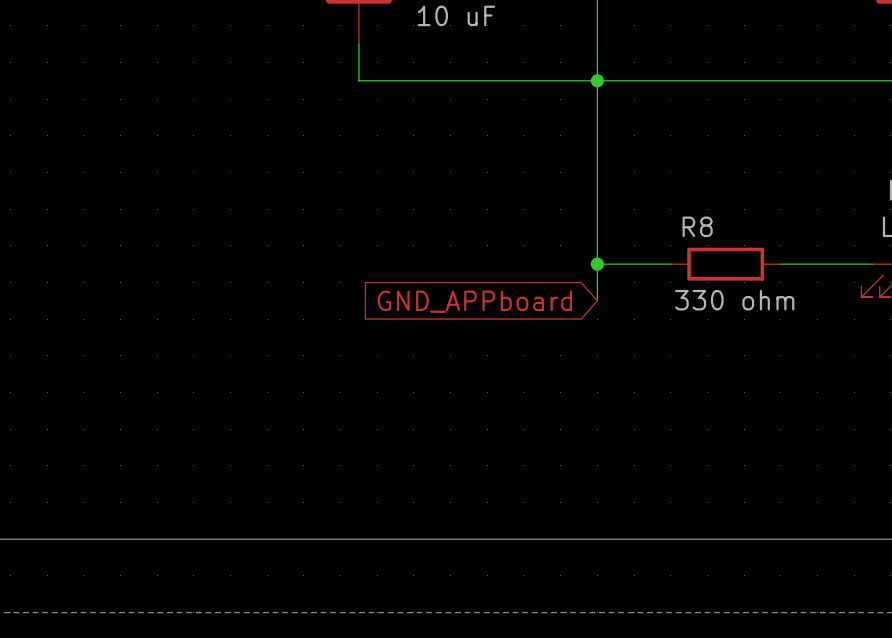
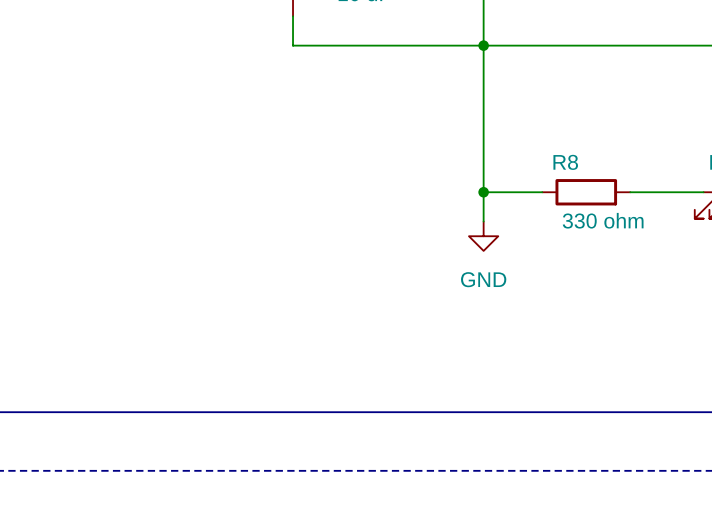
global label: GND_APPboard (474, 301) -> none
power symbol: none -> GND (483, 236)

